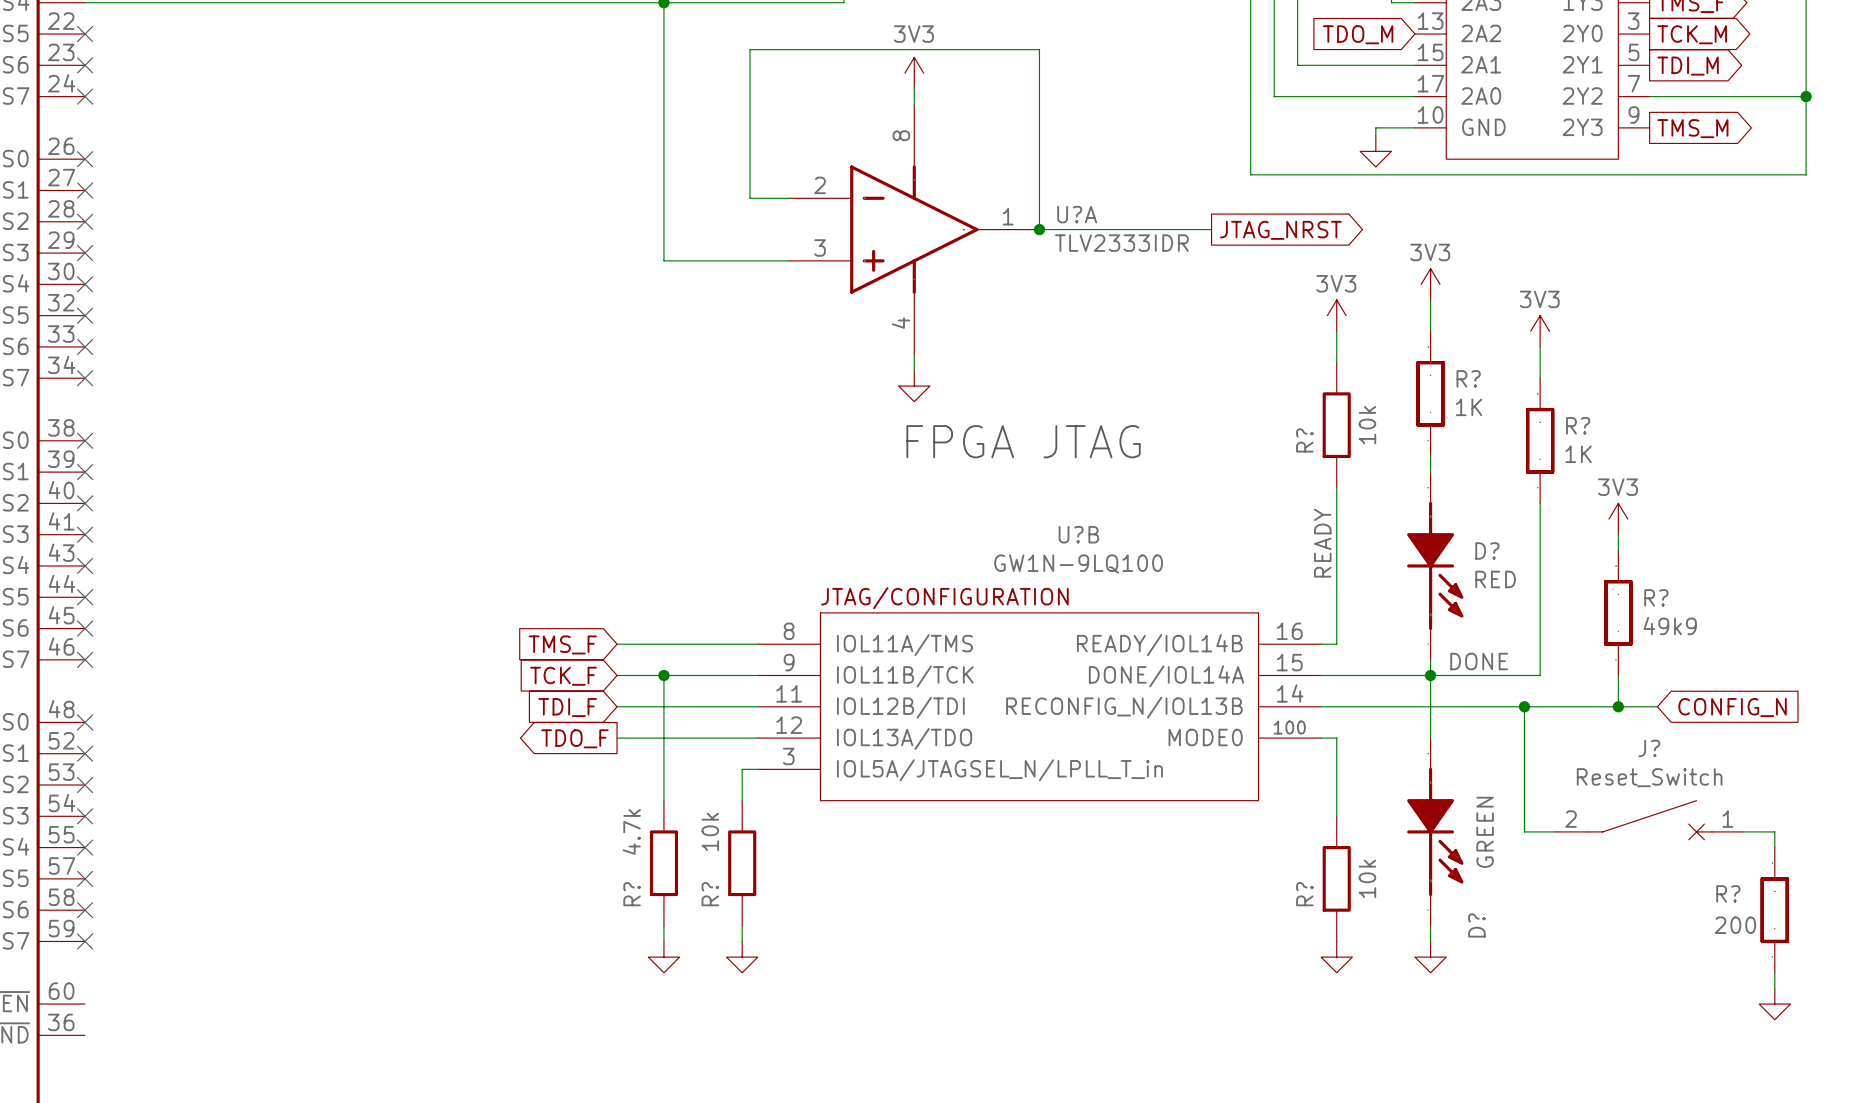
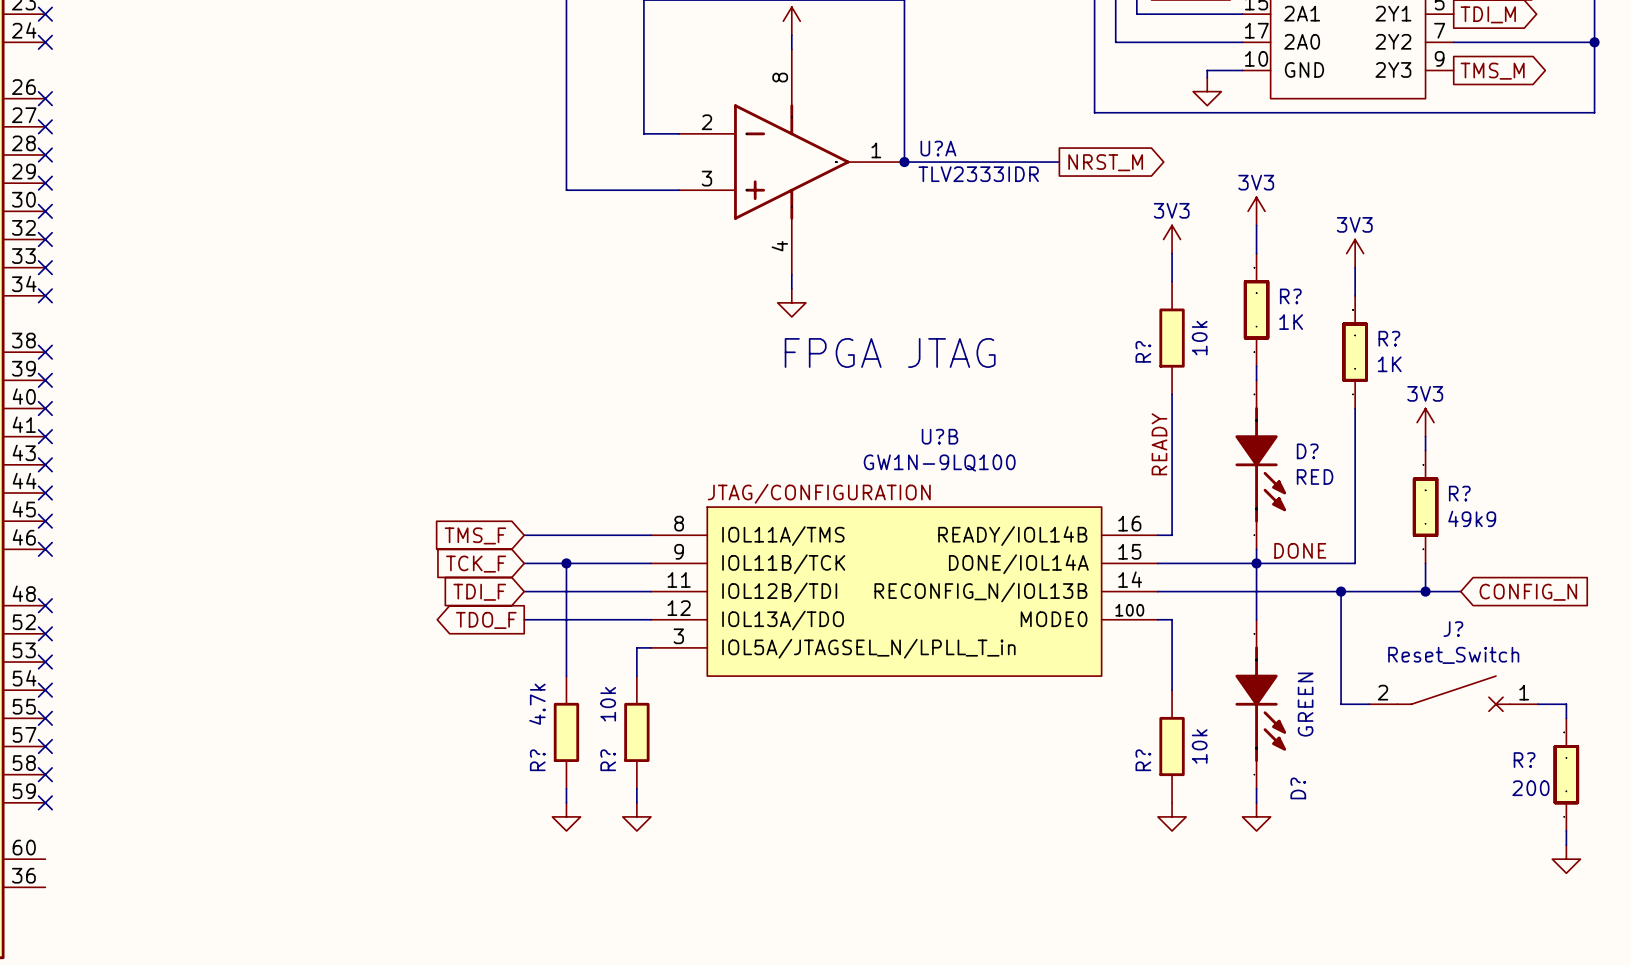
global label: JTAG_NRST (1280, 230) -> NRST_M (1105, 162)

